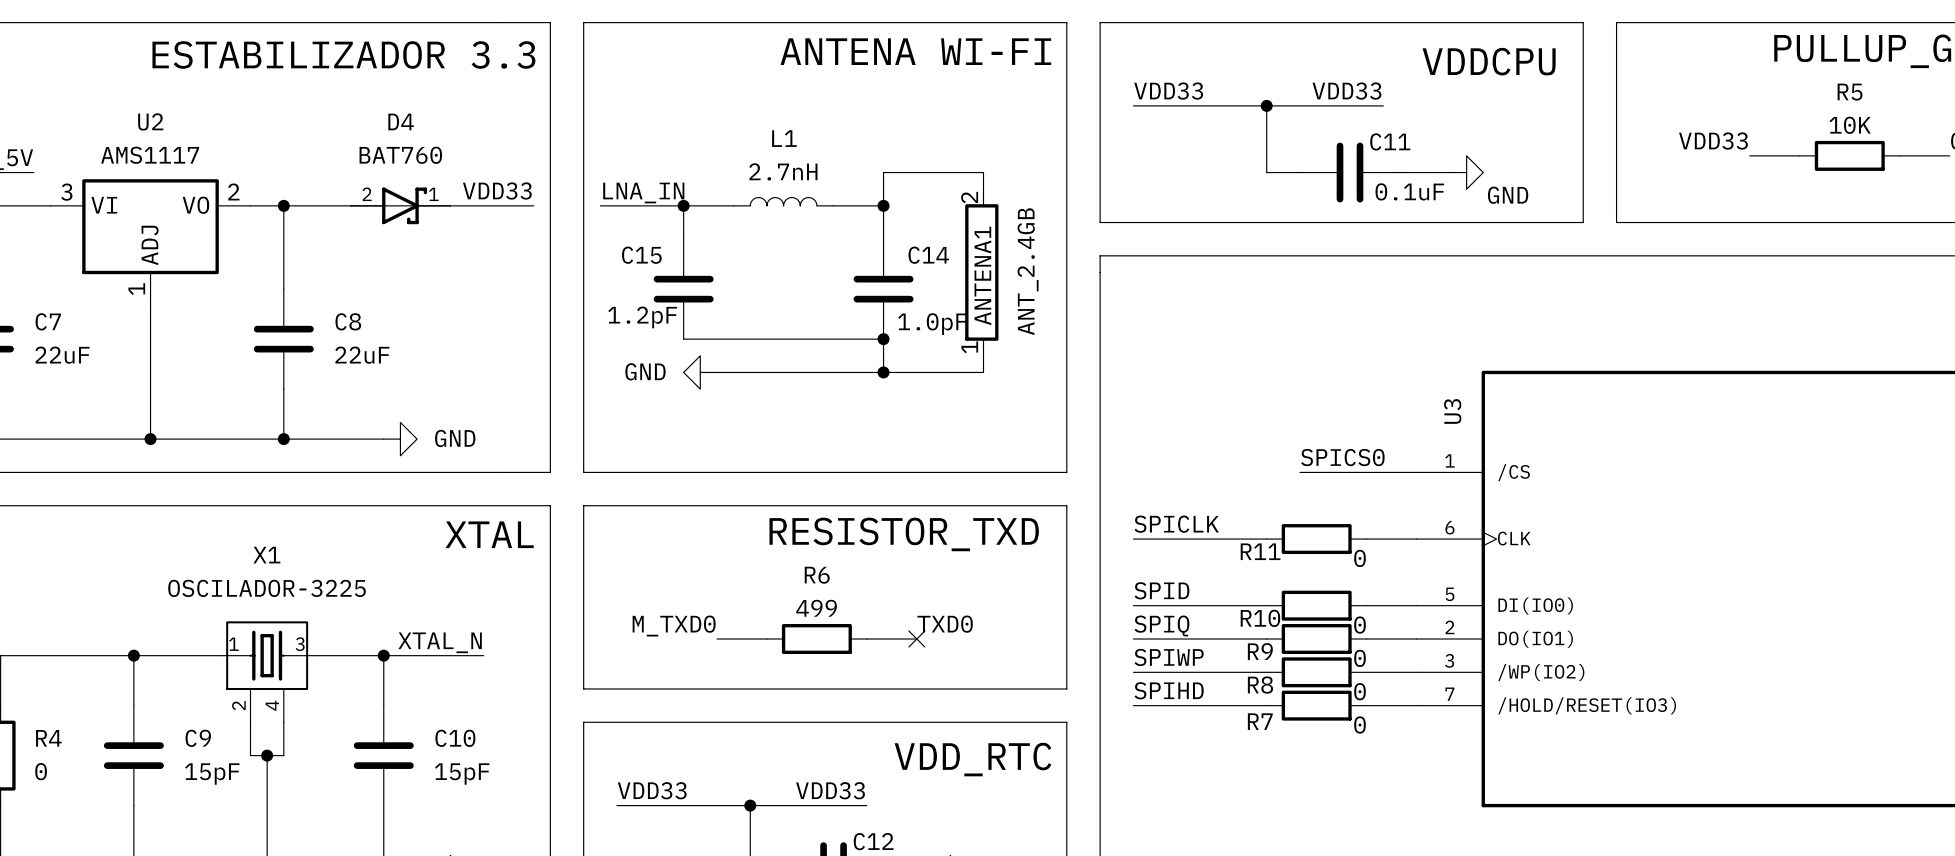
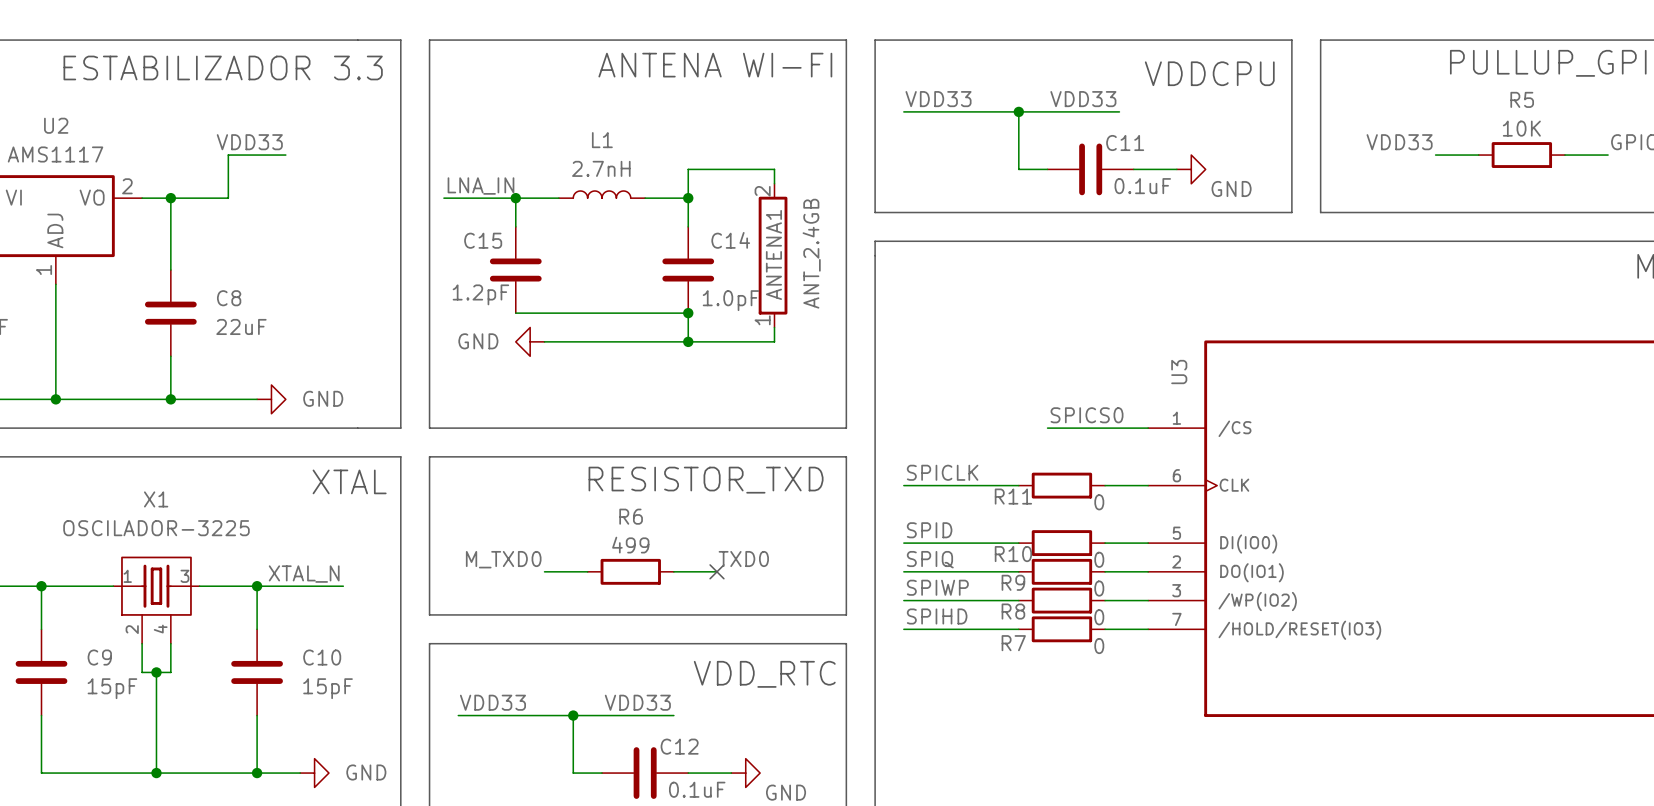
wire: none -> (285, 155) (228, 155) (228, 198)
label position: VDD33 (497, 191) -> VDD33 (249, 142)
D4: BAT760 (400, 205) -> none
wire: (450, 205) (533, 205) -> none

